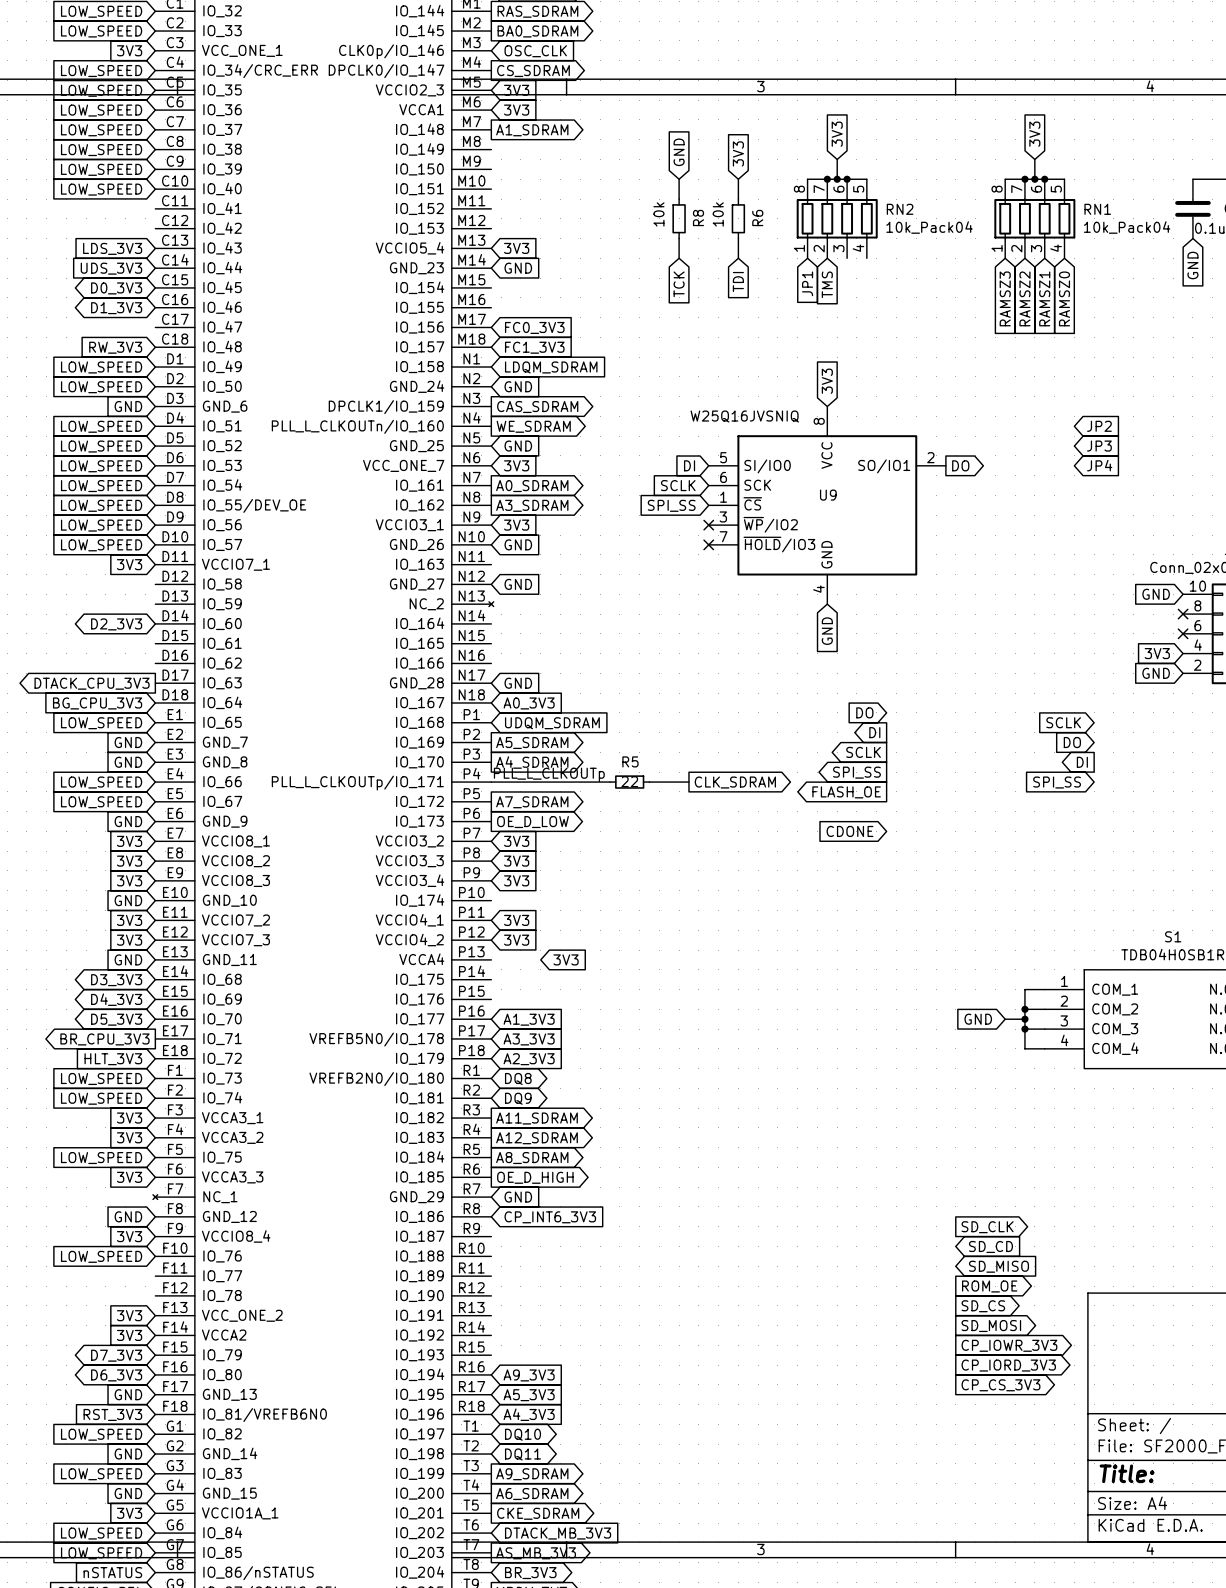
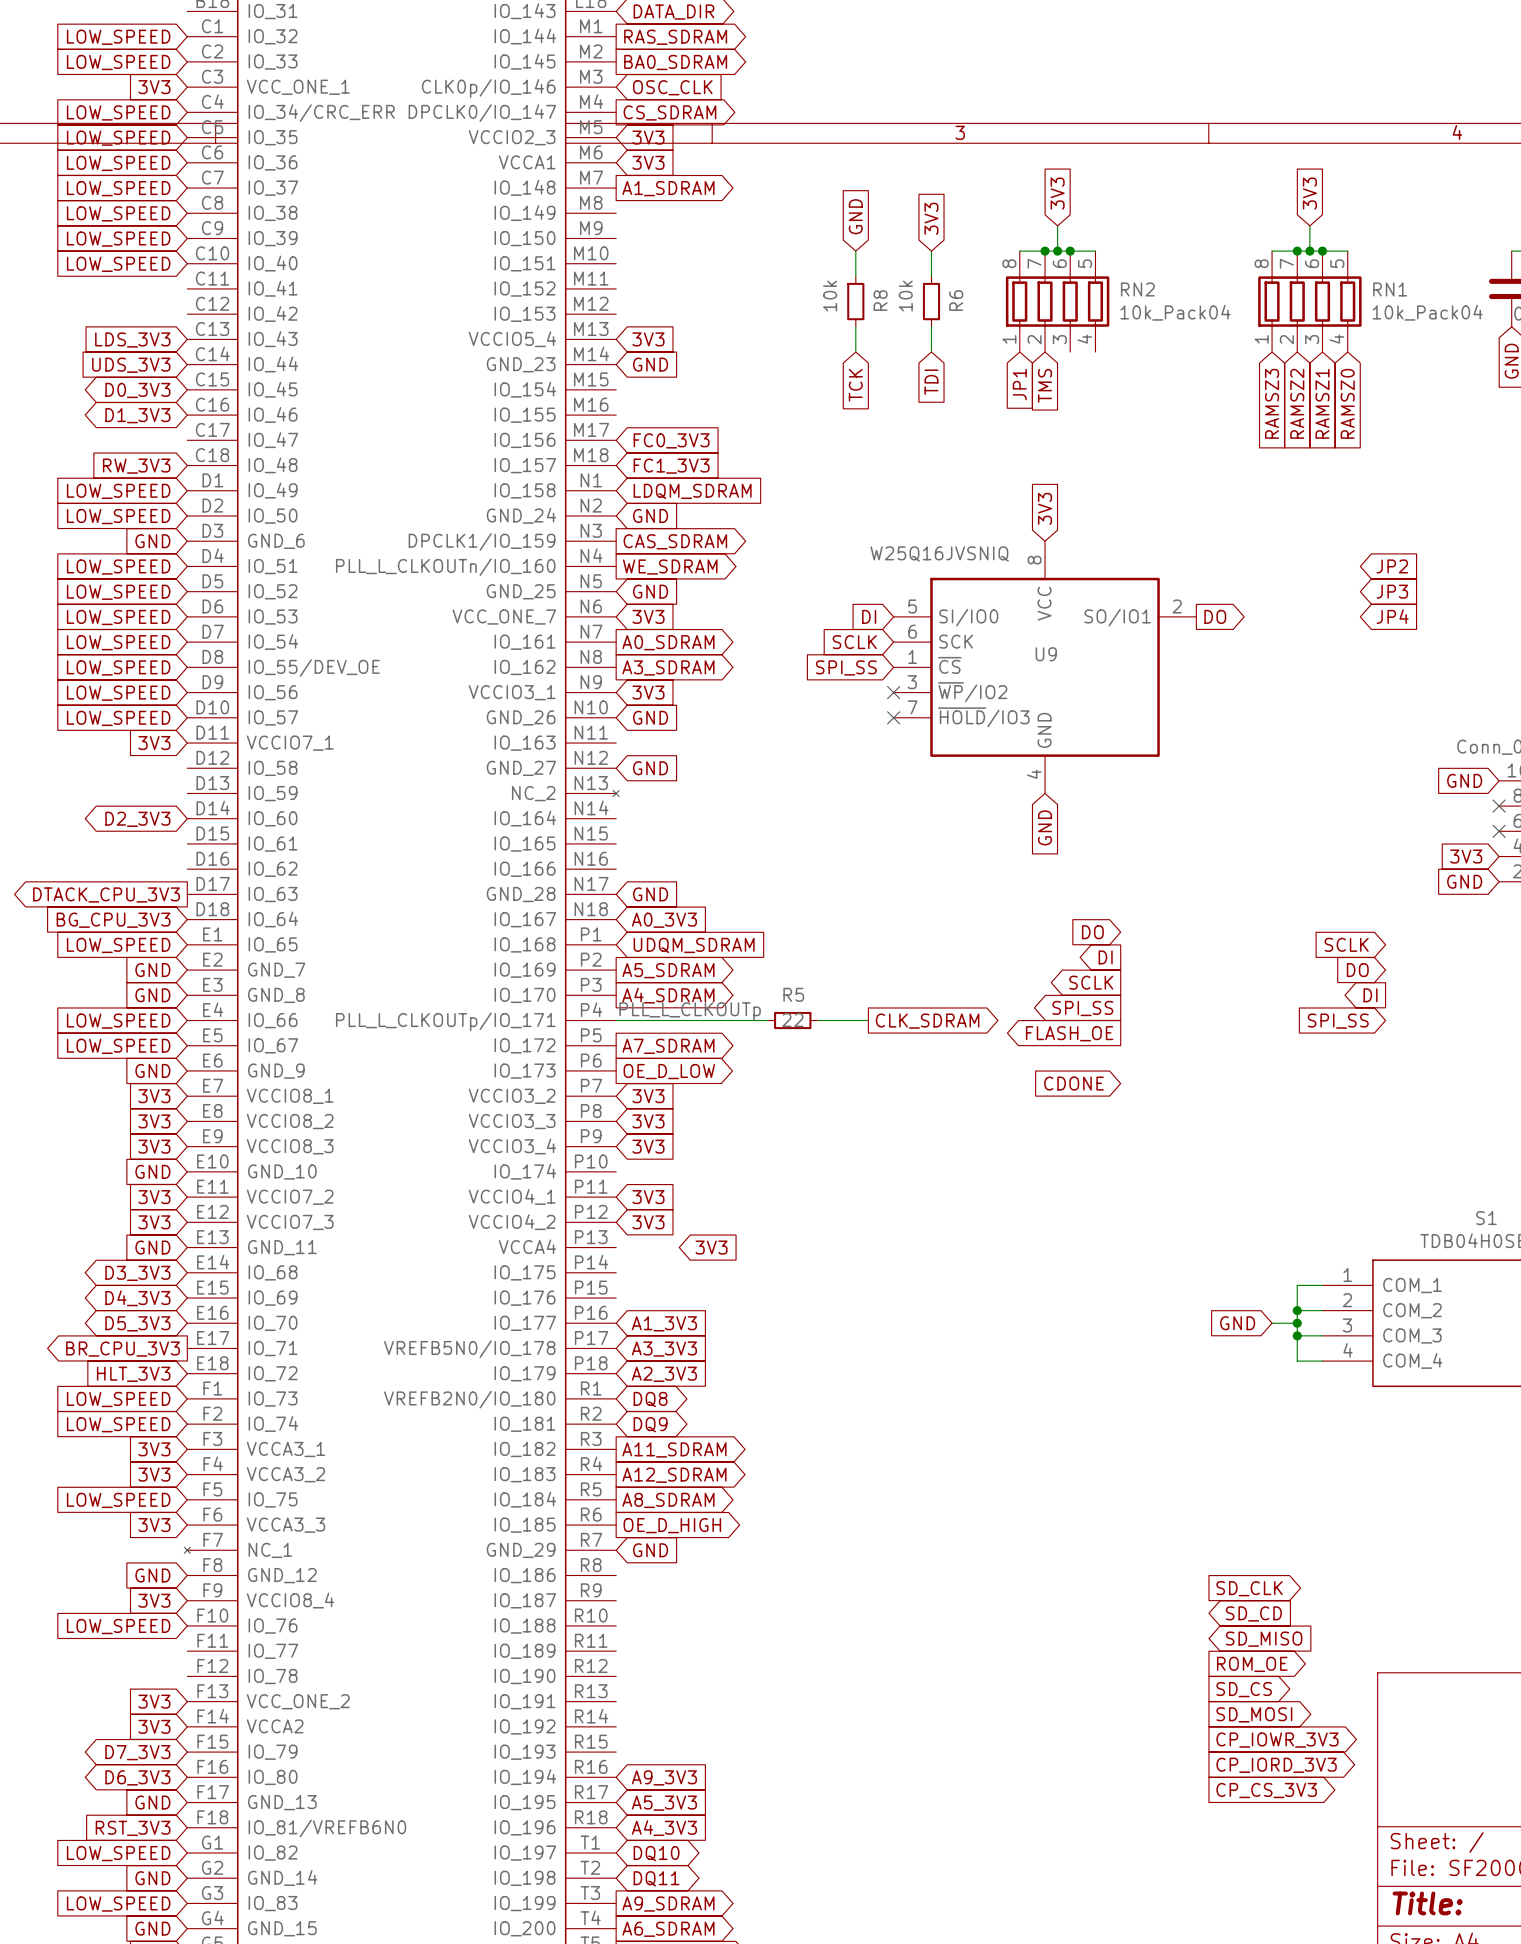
global label: CP_INT6_3V3 (550, 1217) -> none

